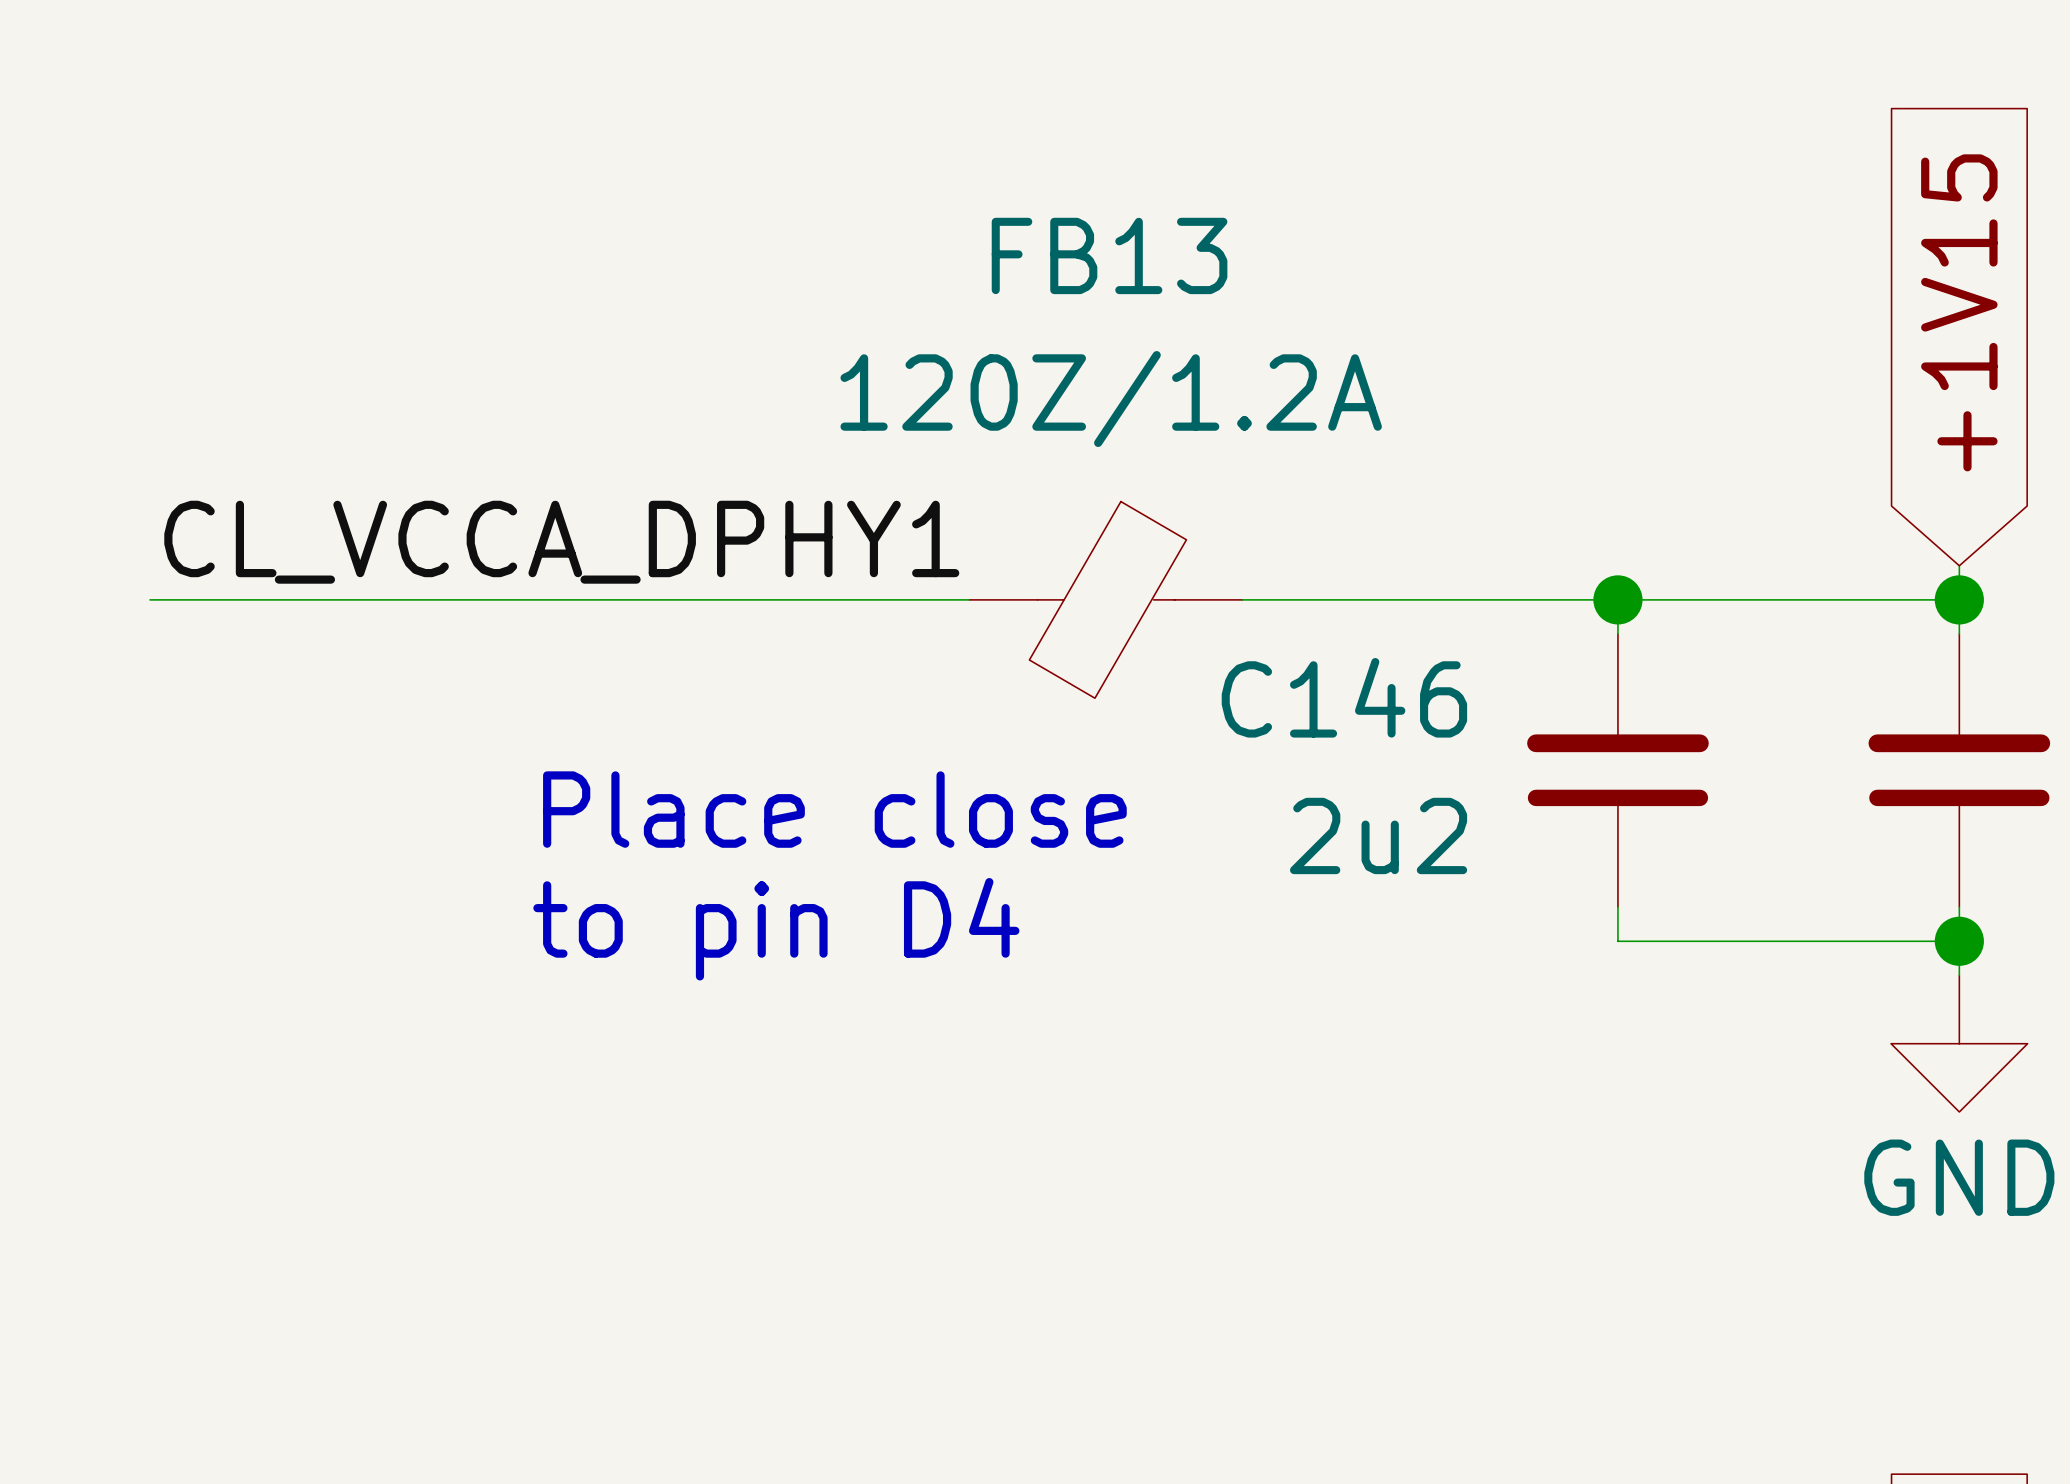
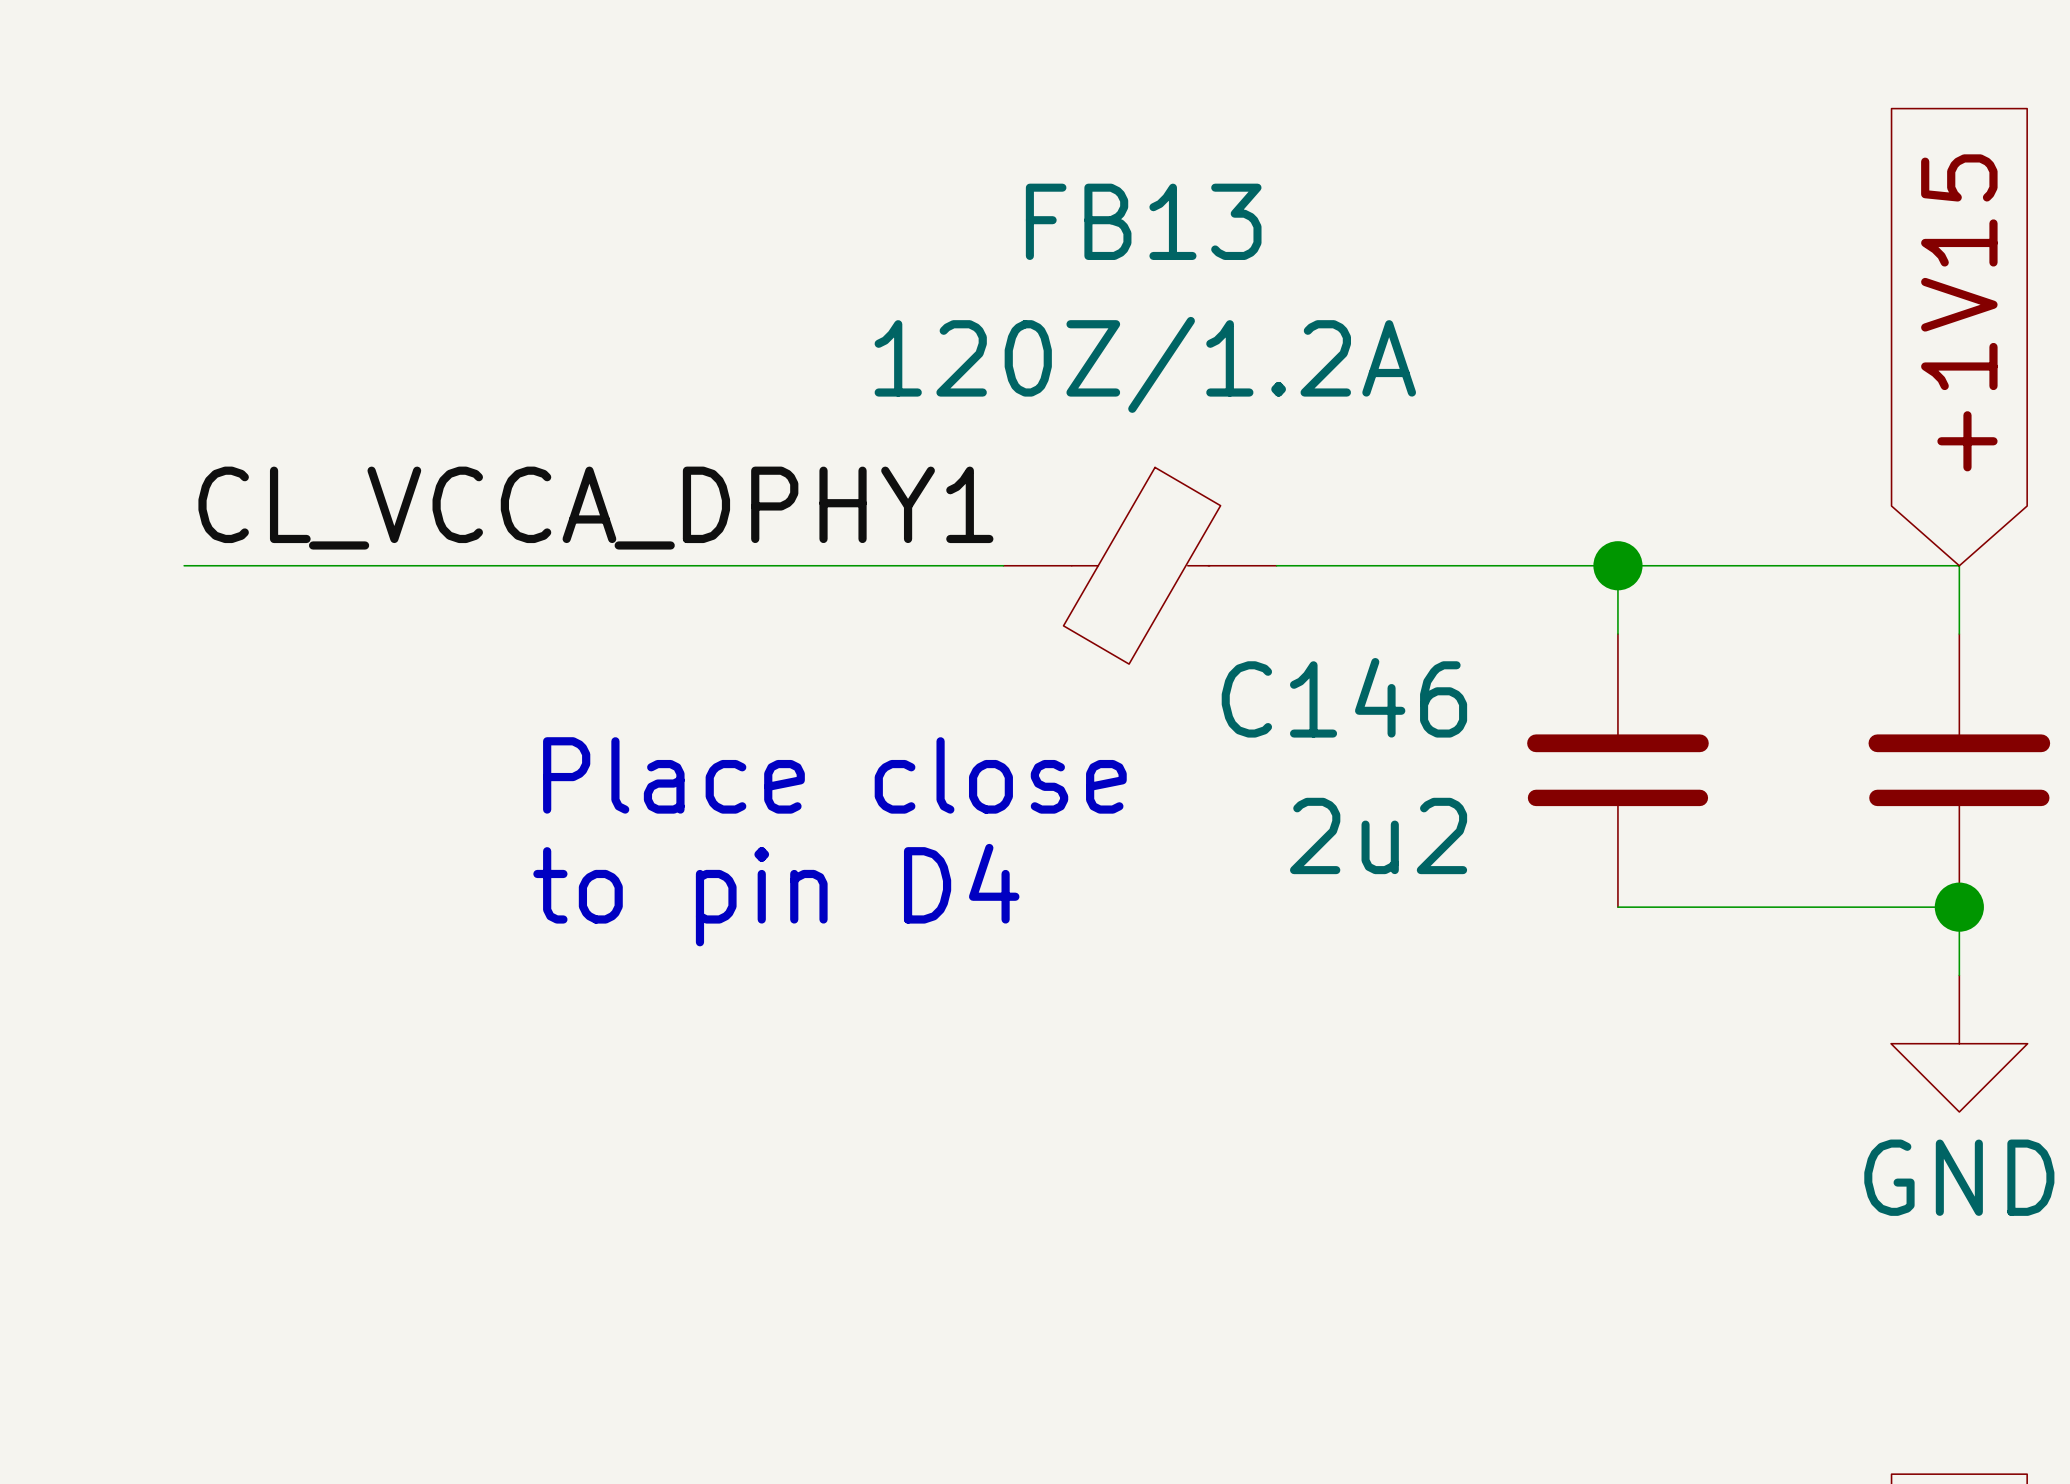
label position: CL_VCCA_DPHY1 (561, 542) -> CL_VCCA_DPHY1 (595, 508)
wire: none -> (1276, 565) (1959, 565)
wire: (149, 599) (969, 599) -> (184, 565) (1003, 565)
FB13 position: (1105, 599) -> (1140, 565)
wire: (1242, 599) (1959, 599) -> none
junction position: (1617, 599) -> (1617, 565)
junction: (1959, 599) -> none
text position: Place close (834, 809) -> Place close (834, 775)
wire: (1617, 907) (1617, 941) (1959, 941) -> (1617, 907) (1959, 907)
text position: to pin D4 (776, 929) -> to pin D4 (776, 895)
junction position: (1959, 941) -> (1959, 907)

